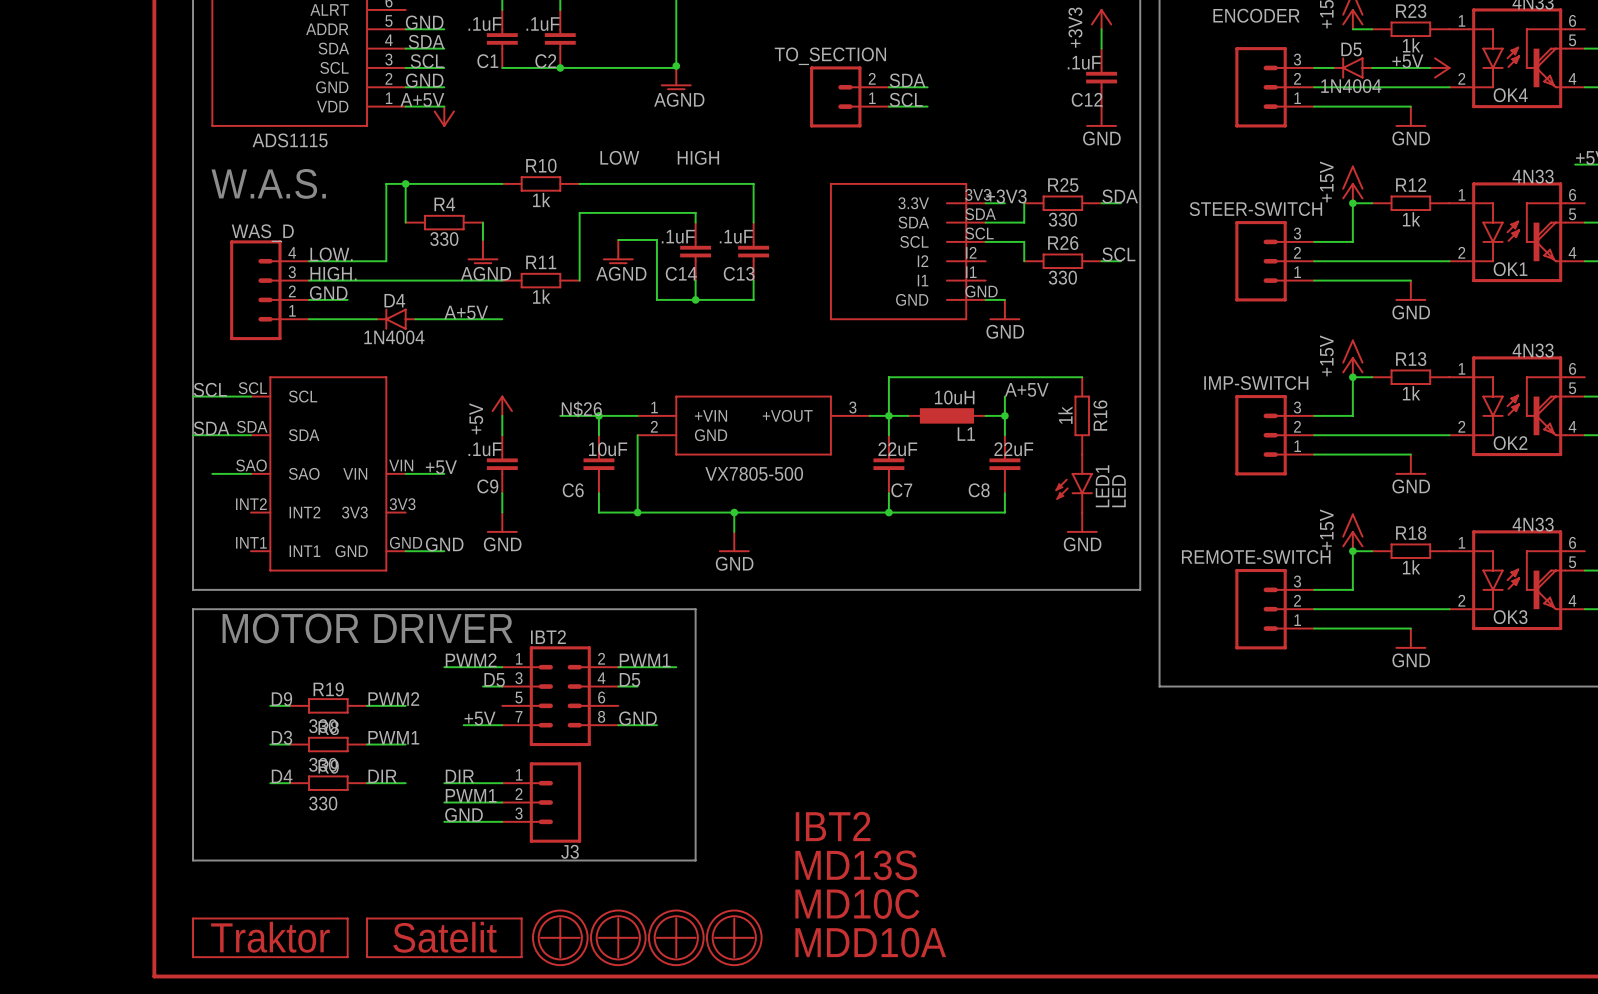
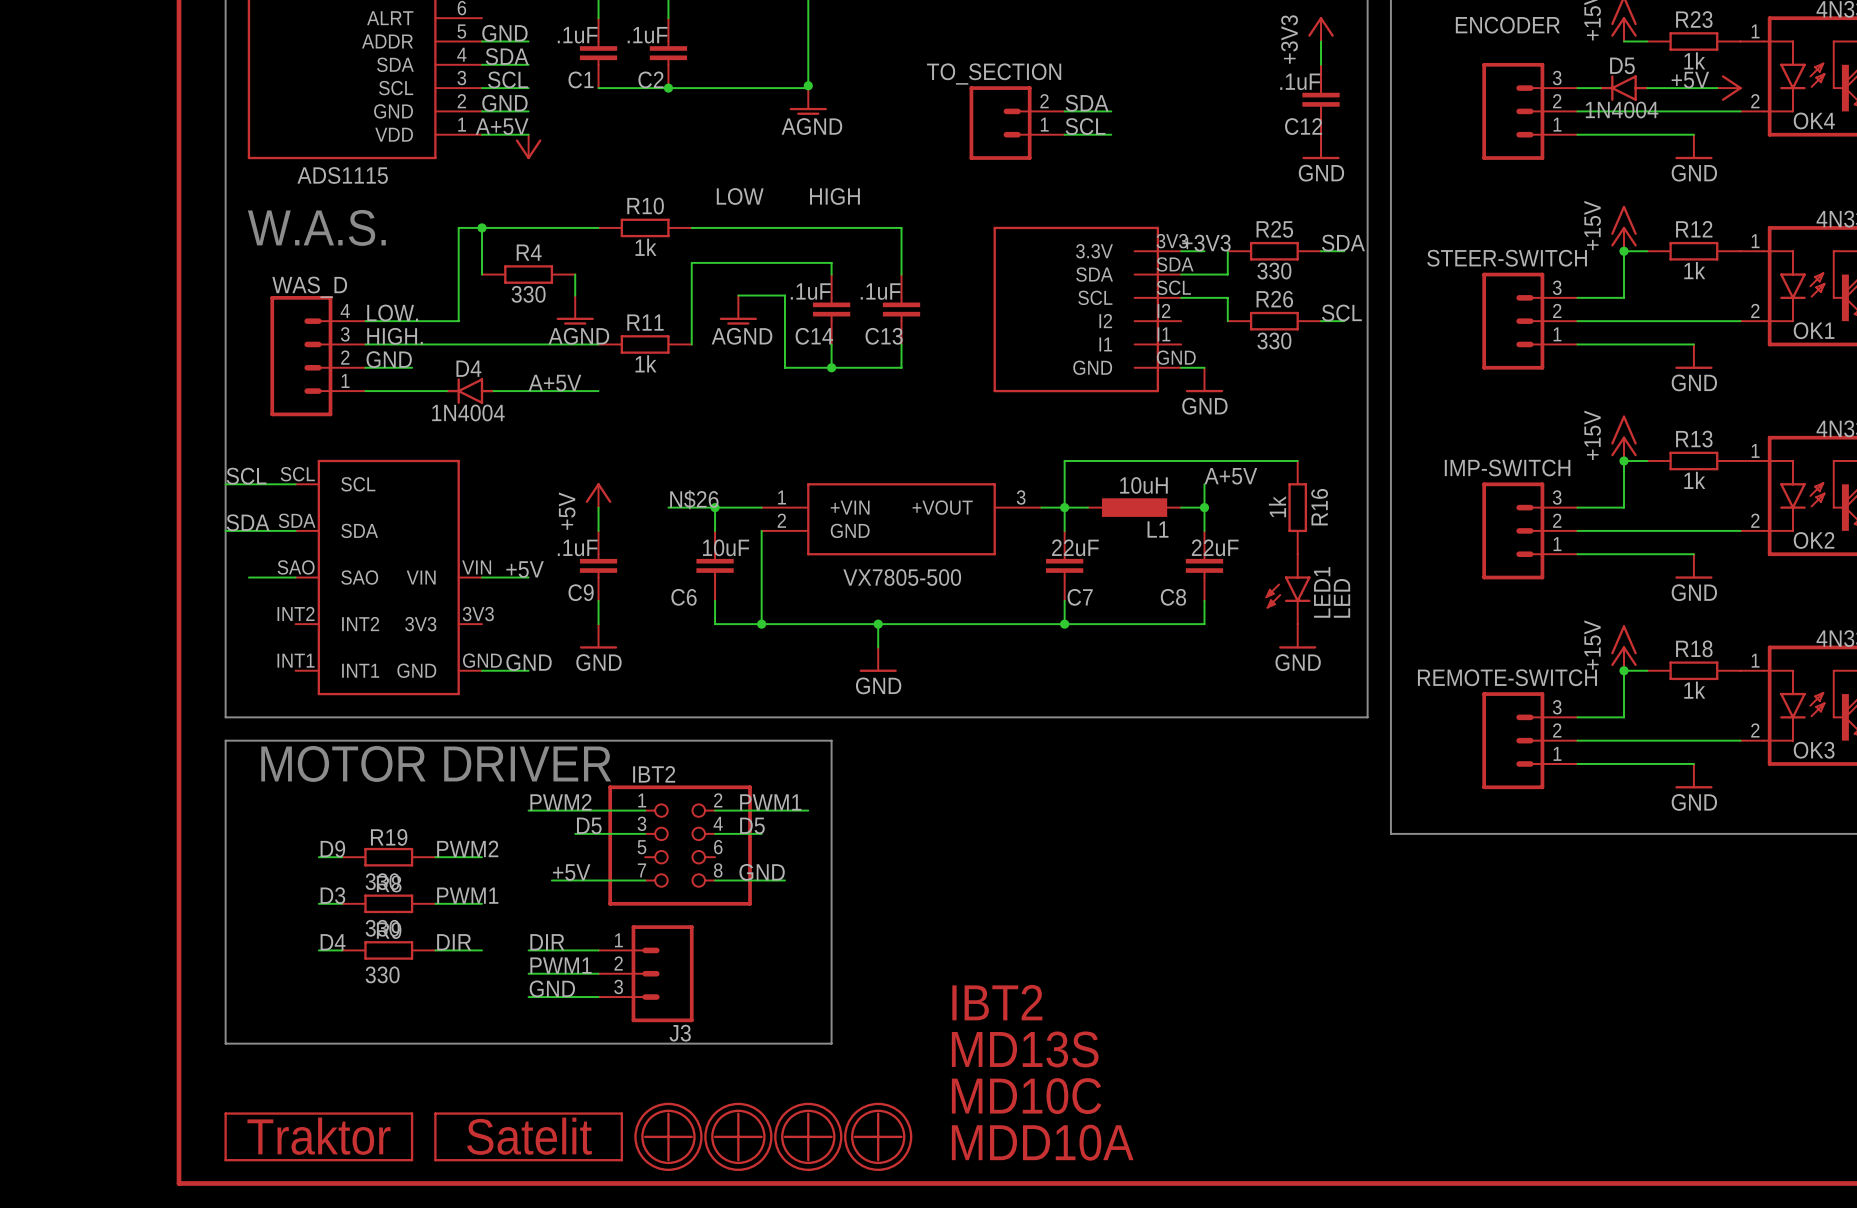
IBT2 symbol: [502, 646, 619, 747] -> [608, 785, 752, 906]

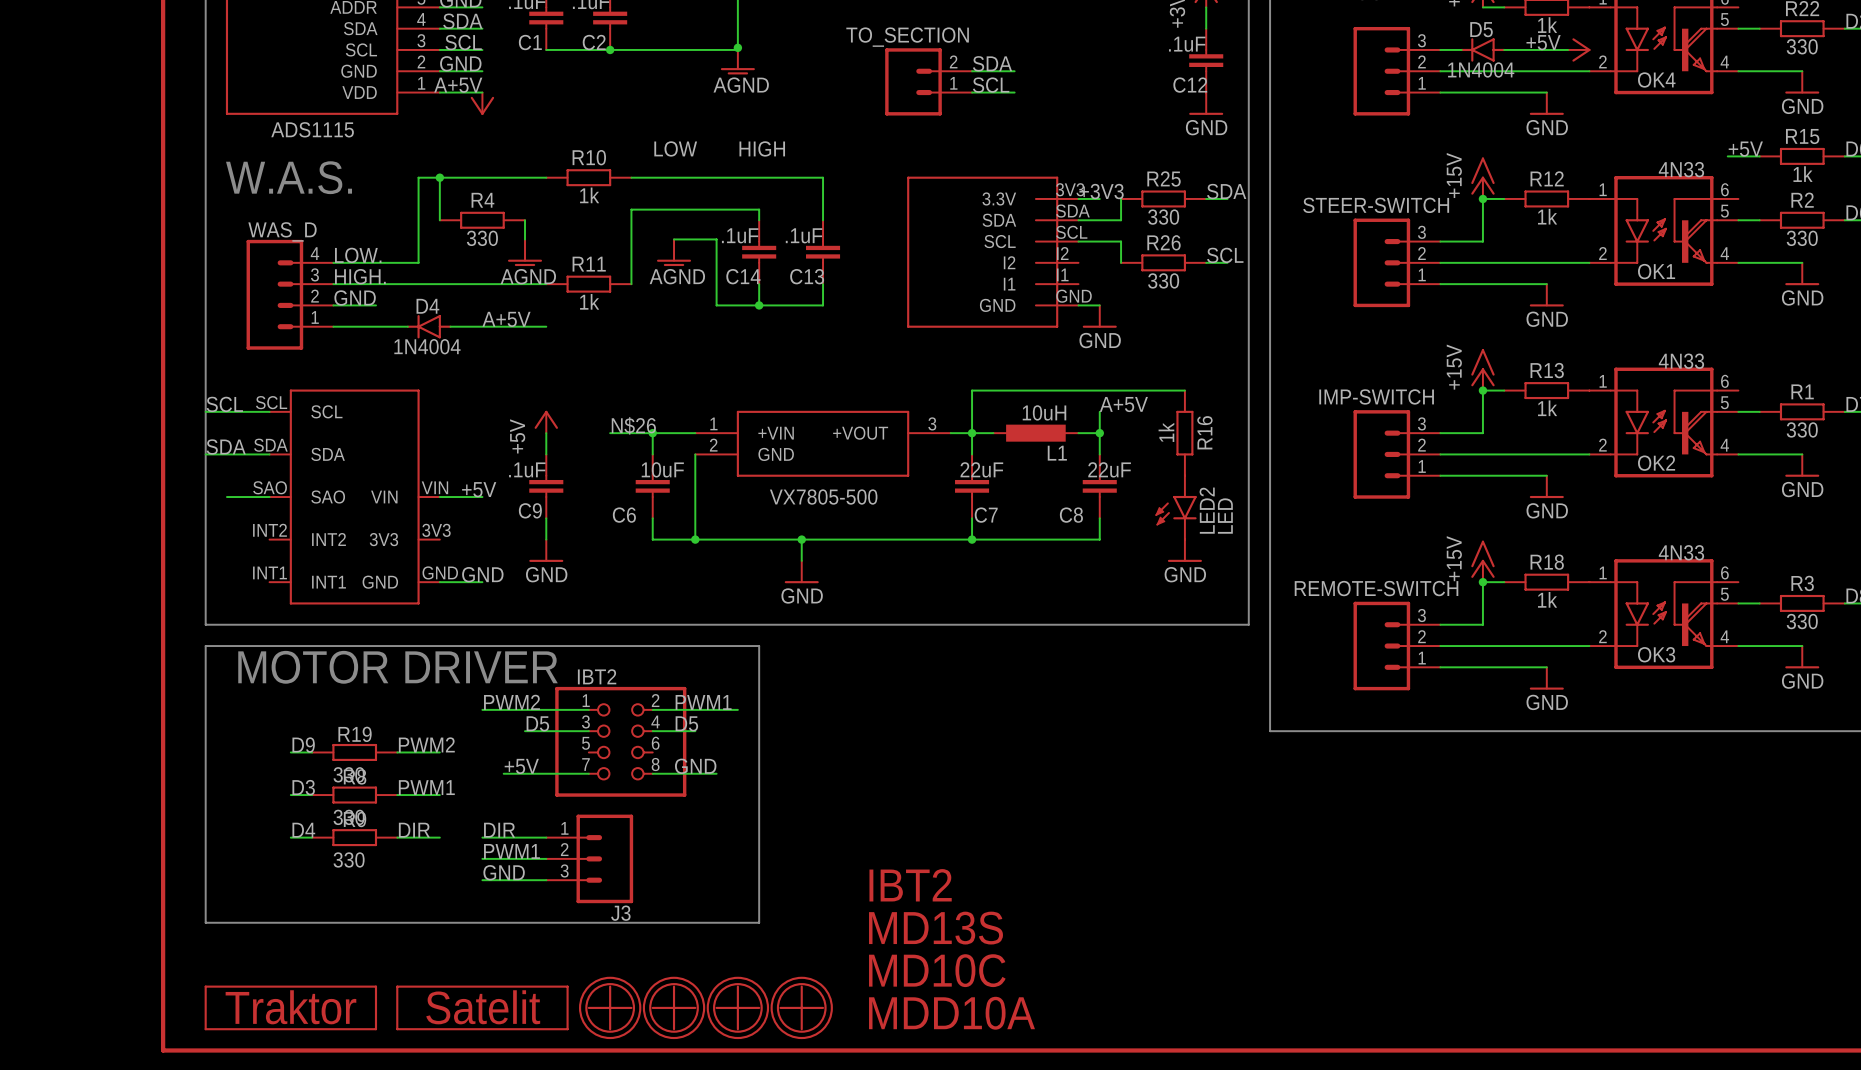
LED1 name: LED1 (1322, 592) -> LED2 (1207, 510)

